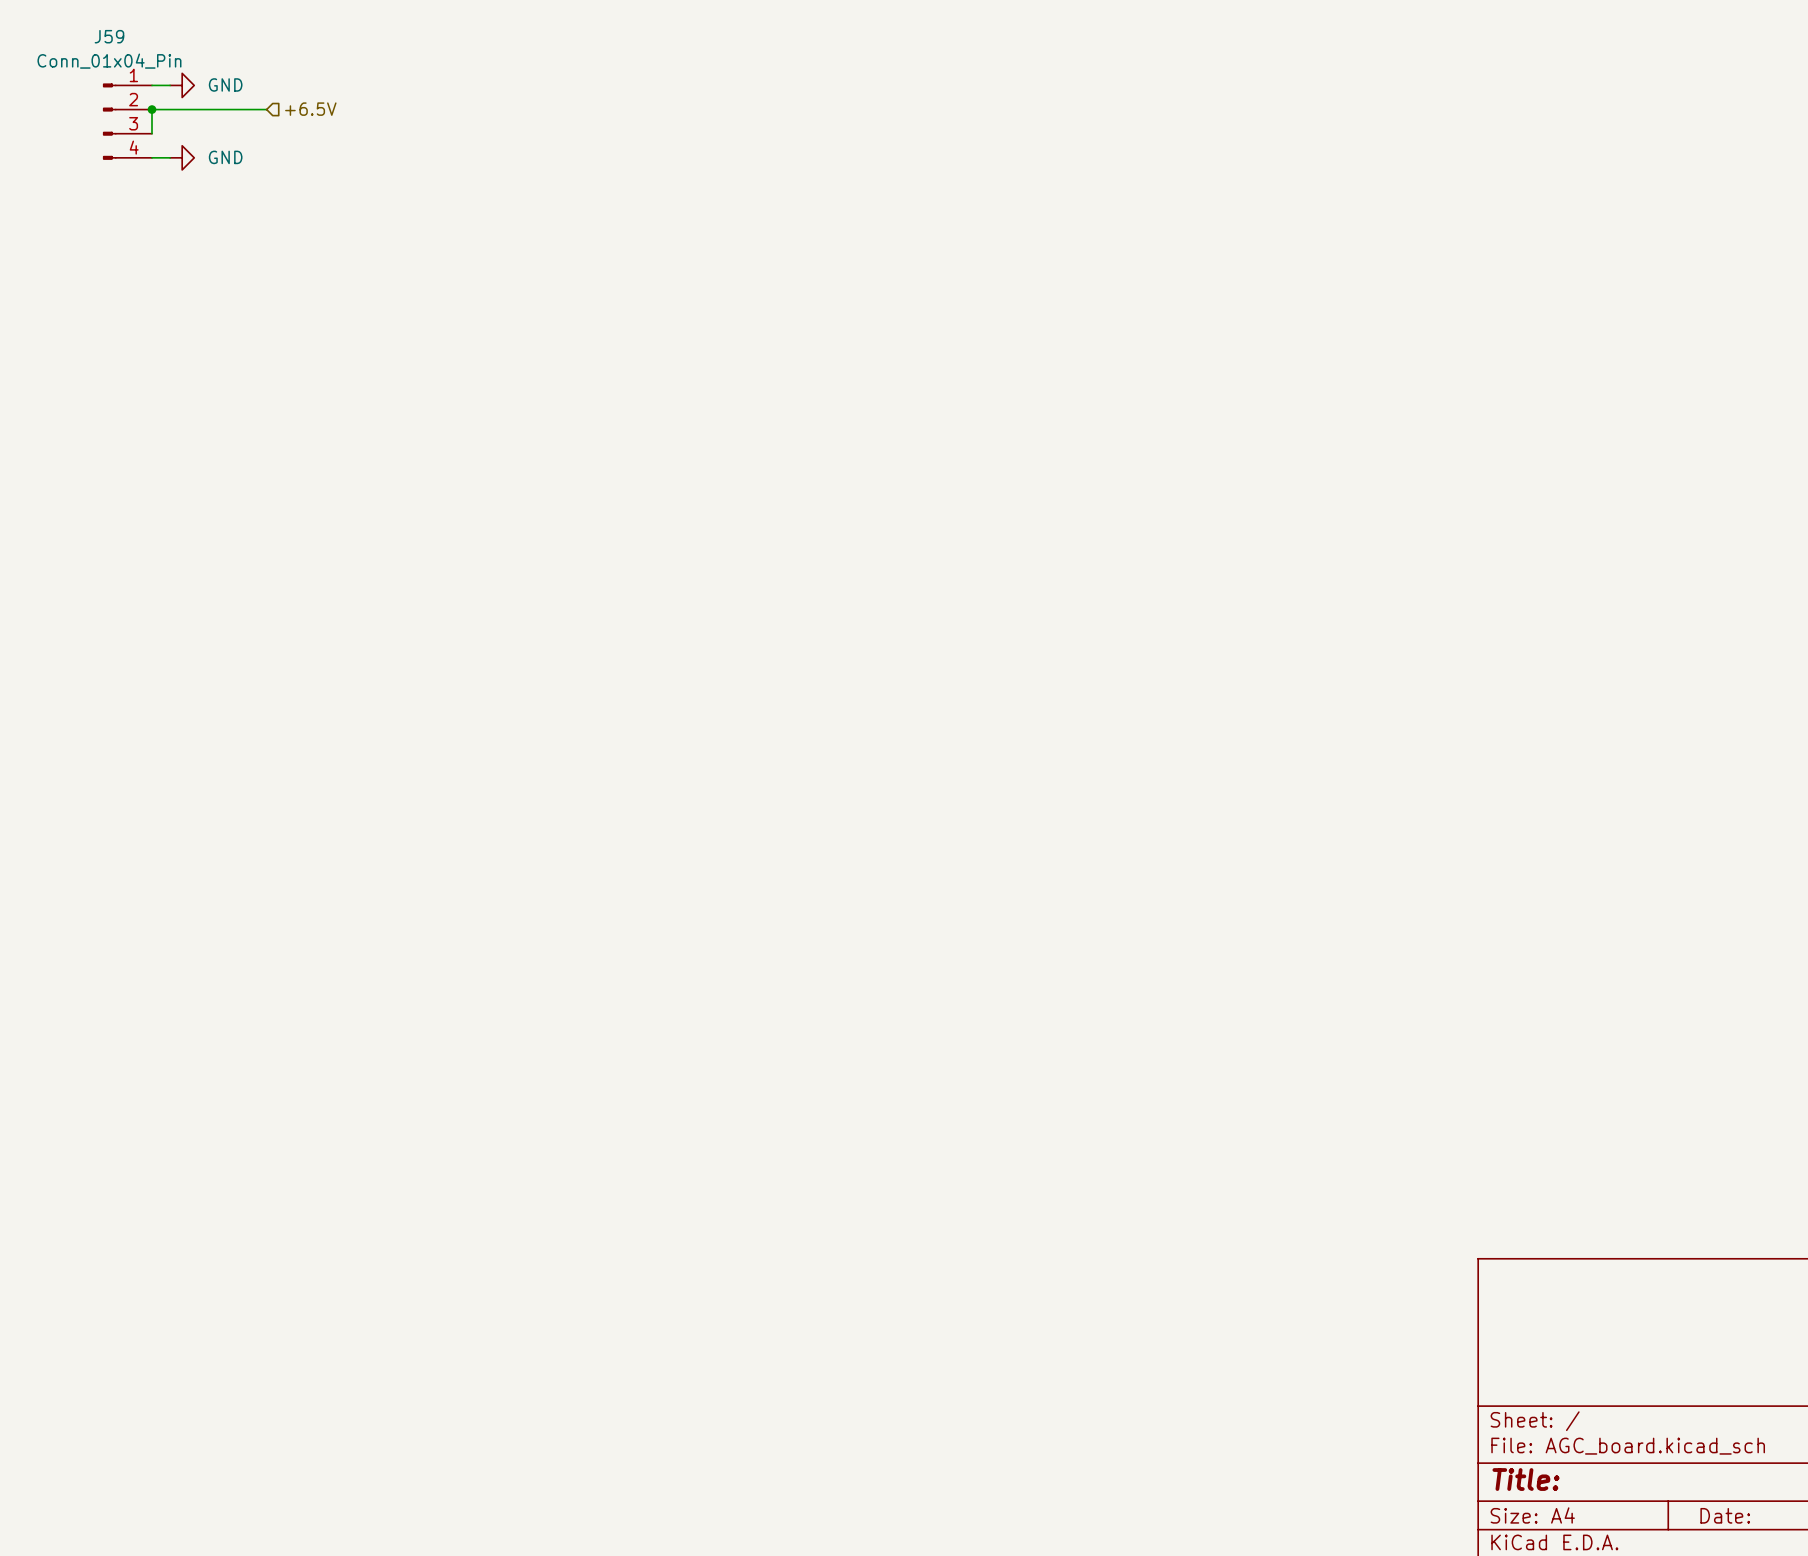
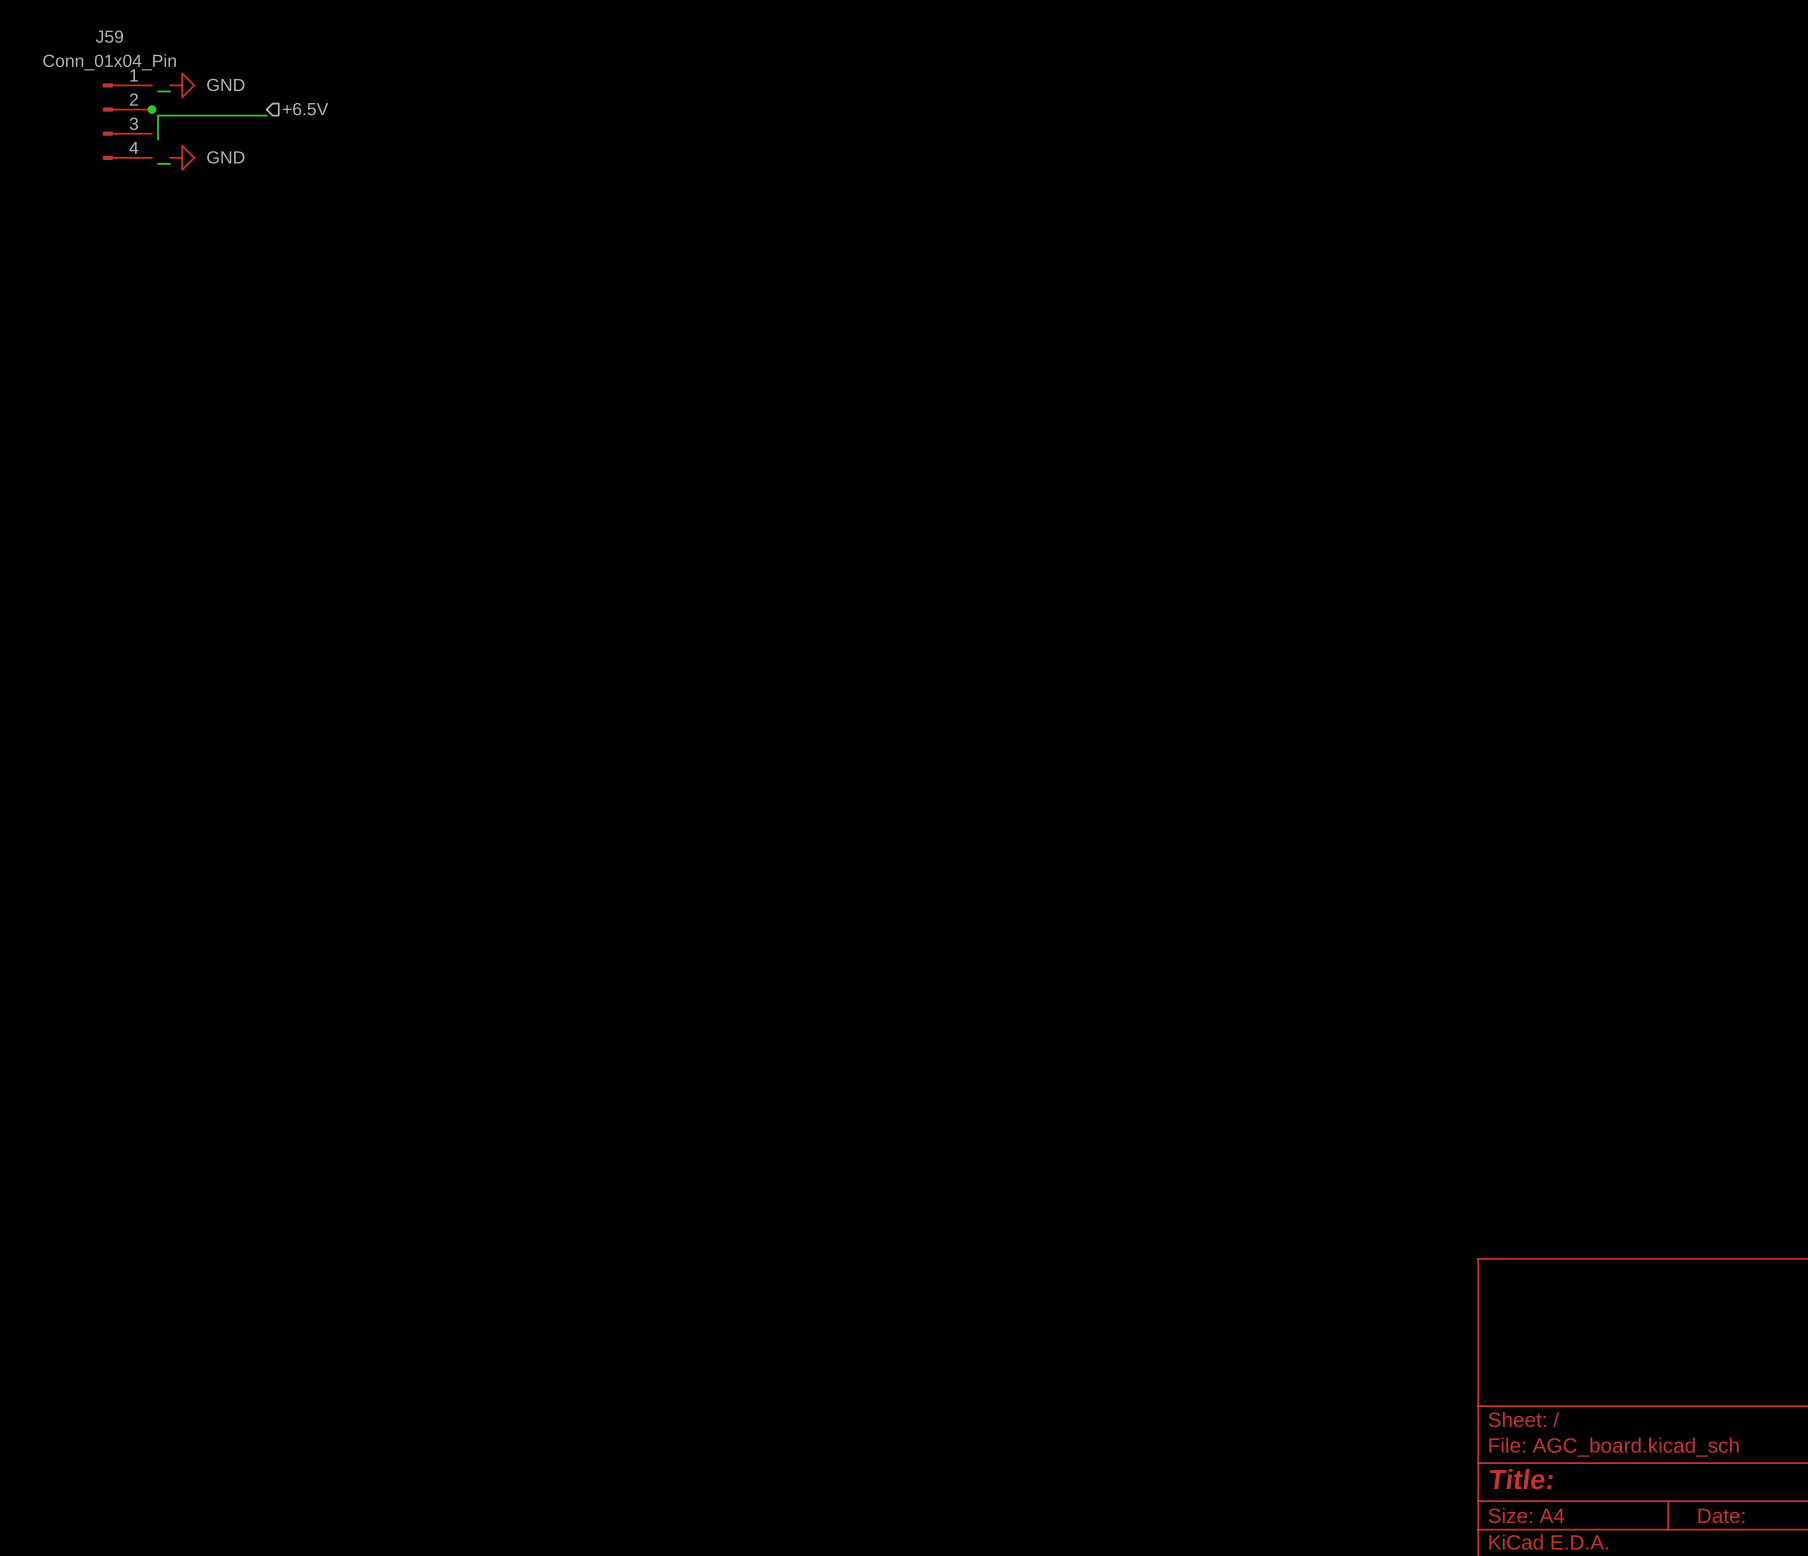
wire: (152, 85) (170, 85) -> none
wire: none -> (158, 91) (170, 91)
wire: (266, 109) (152, 109) (152, 133) -> none
wire: none -> (266, 115) (158, 115) (158, 139)
wire: (152, 157) (170, 157) -> none
wire: none -> (158, 163) (170, 163)

